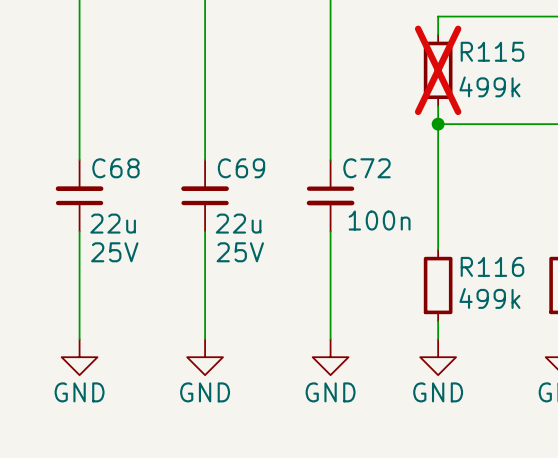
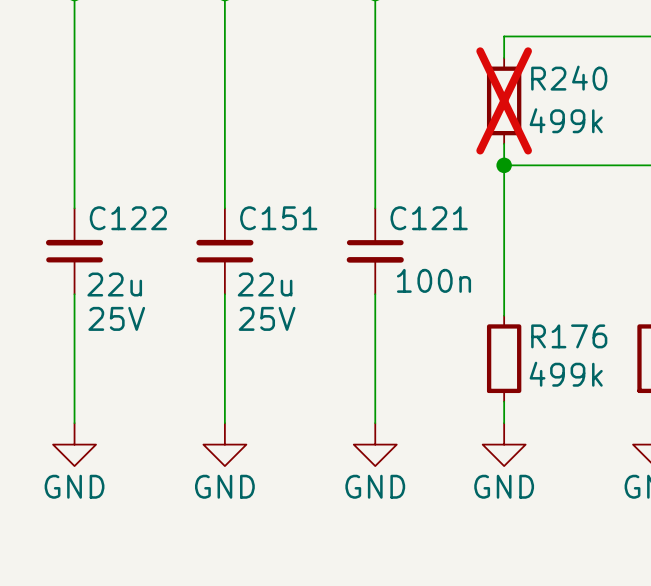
R115 name: R115 (492, 51) -> R240 (569, 78)
C68 name: C68 (115, 168) -> C122 (128, 218)
C69 name: C69 (241, 168) -> C151 (278, 218)
C72 name: C72 (366, 168) -> C121 (429, 218)
R116 name: R116 (492, 266) -> R176 (569, 336)

